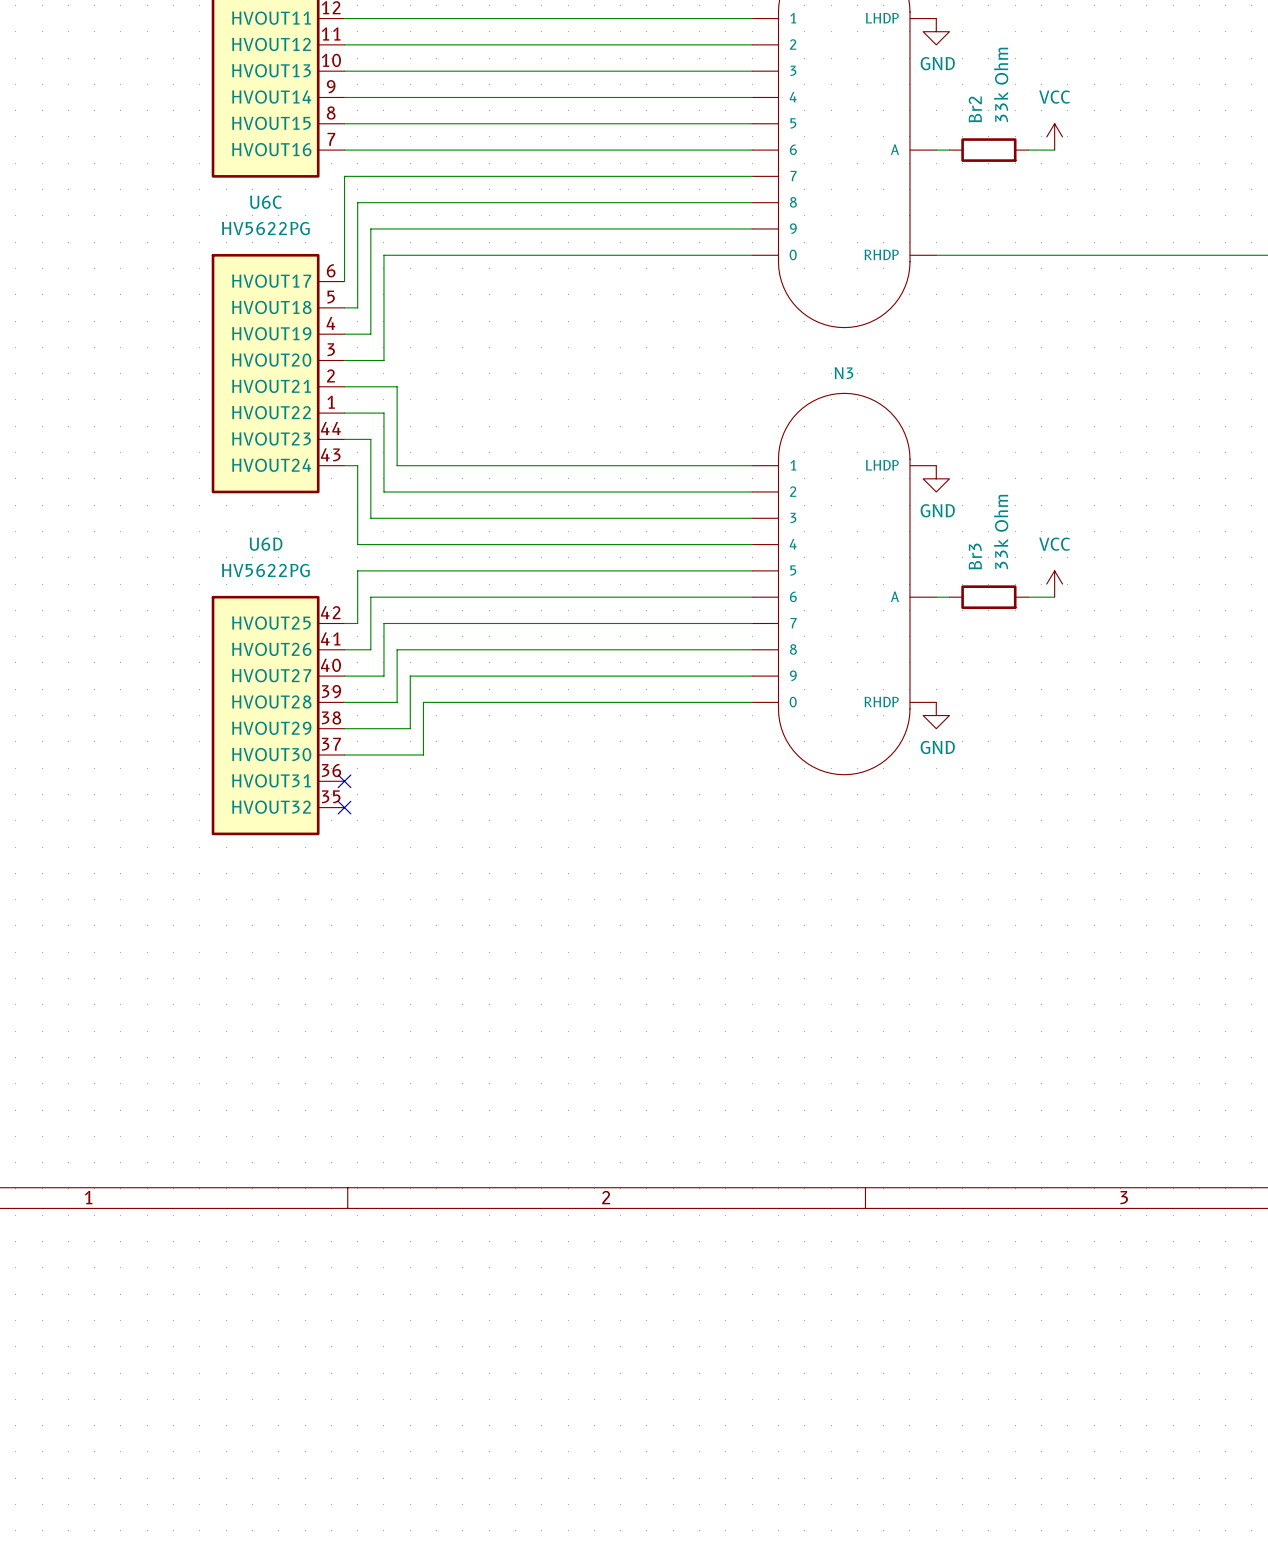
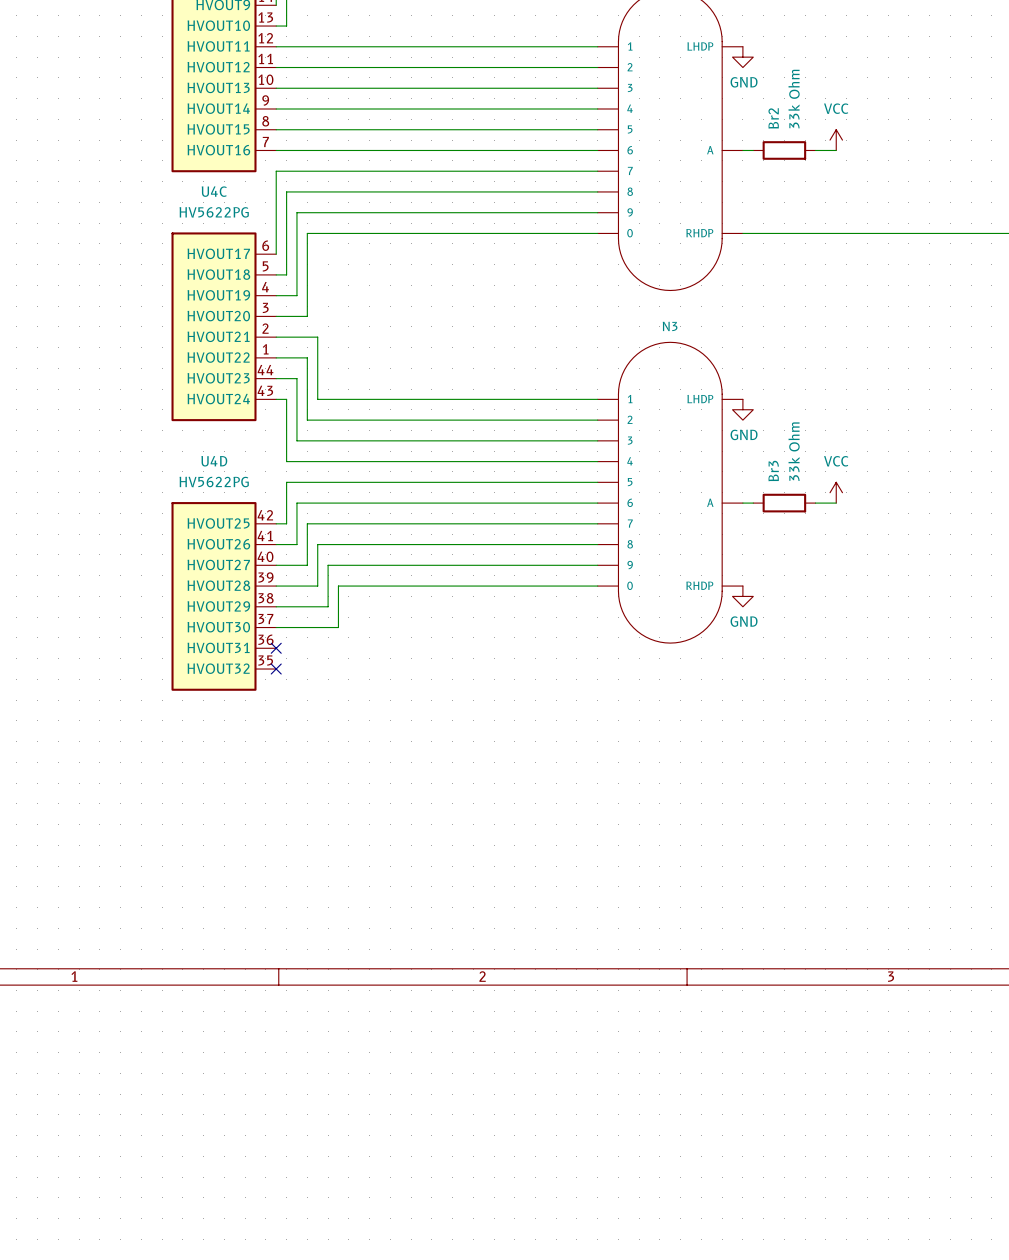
U6C name: U6C (265, 202) -> U4C (214, 191)
U6D name: U6D (266, 544) -> U4D (214, 461)

